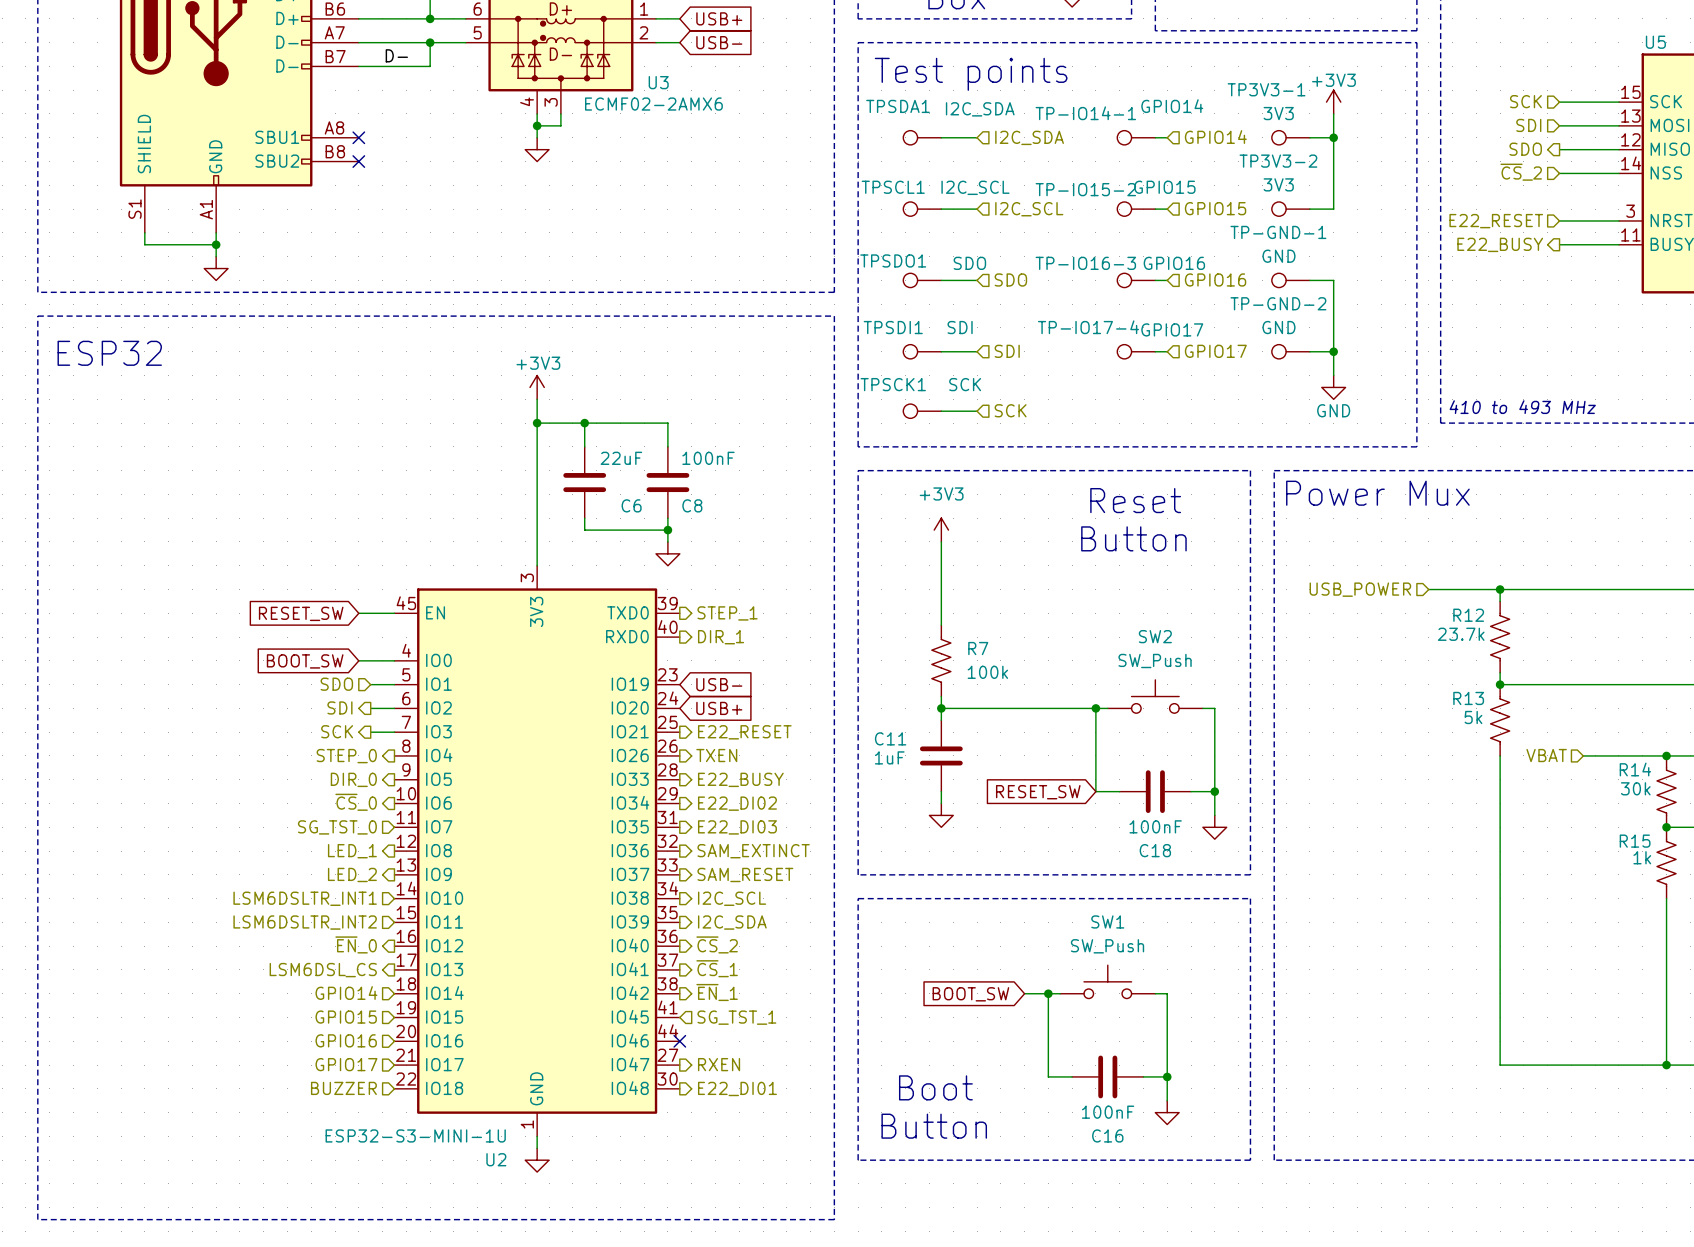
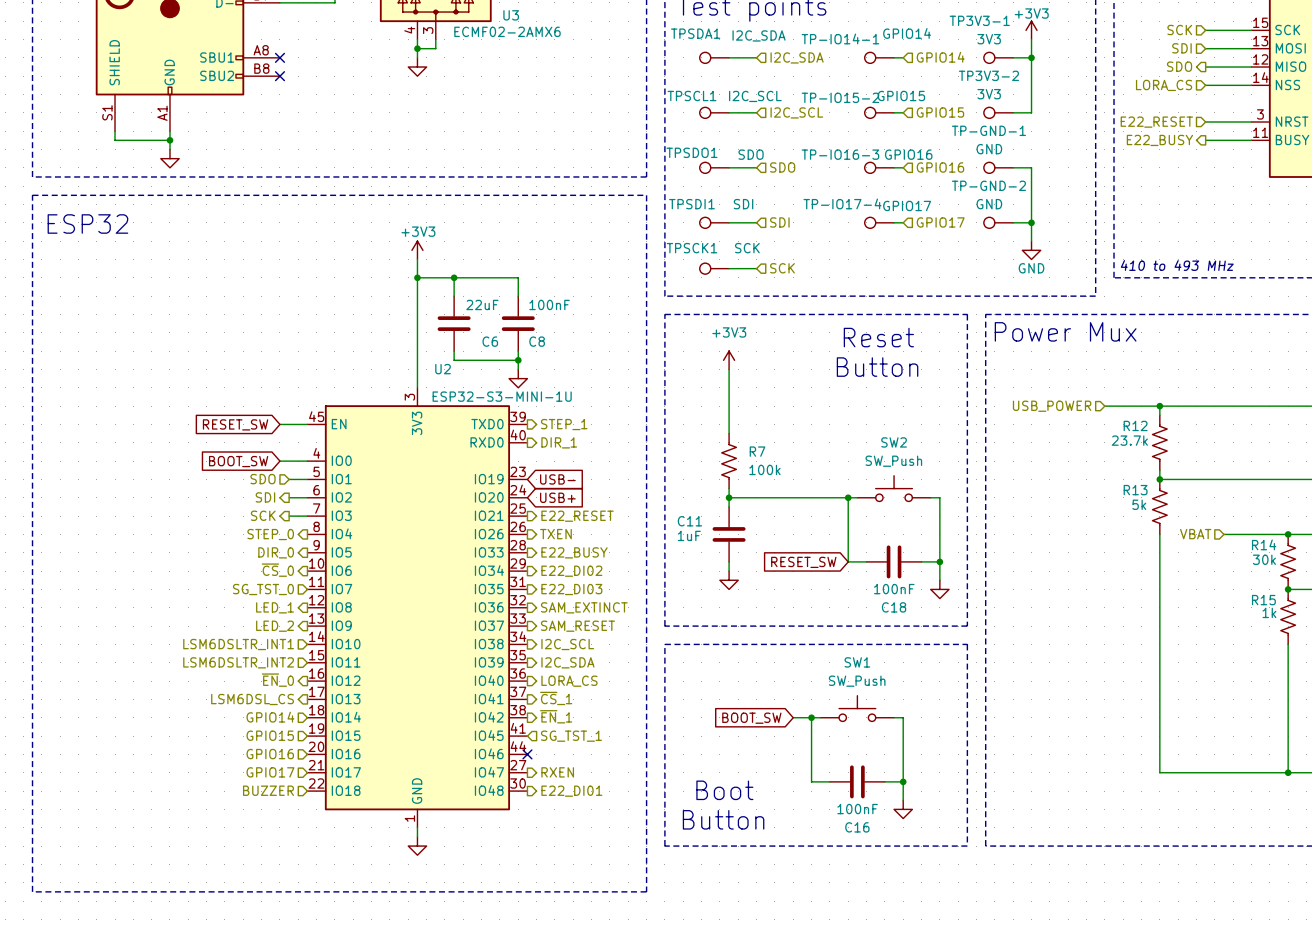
hierarchical label: ~{CS}_2 (1521, 172) -> LORA_CS (1164, 85)
hierarchical label: ~{CS}_2 (717, 944) -> LORA_CS (569, 681)
U2 value position: ESP32-S3-MINI-1U (415, 1135) -> ESP32-S3-MINI-1U (502, 396)
U2 name position: U2 (496, 1159) -> U2 (443, 369)

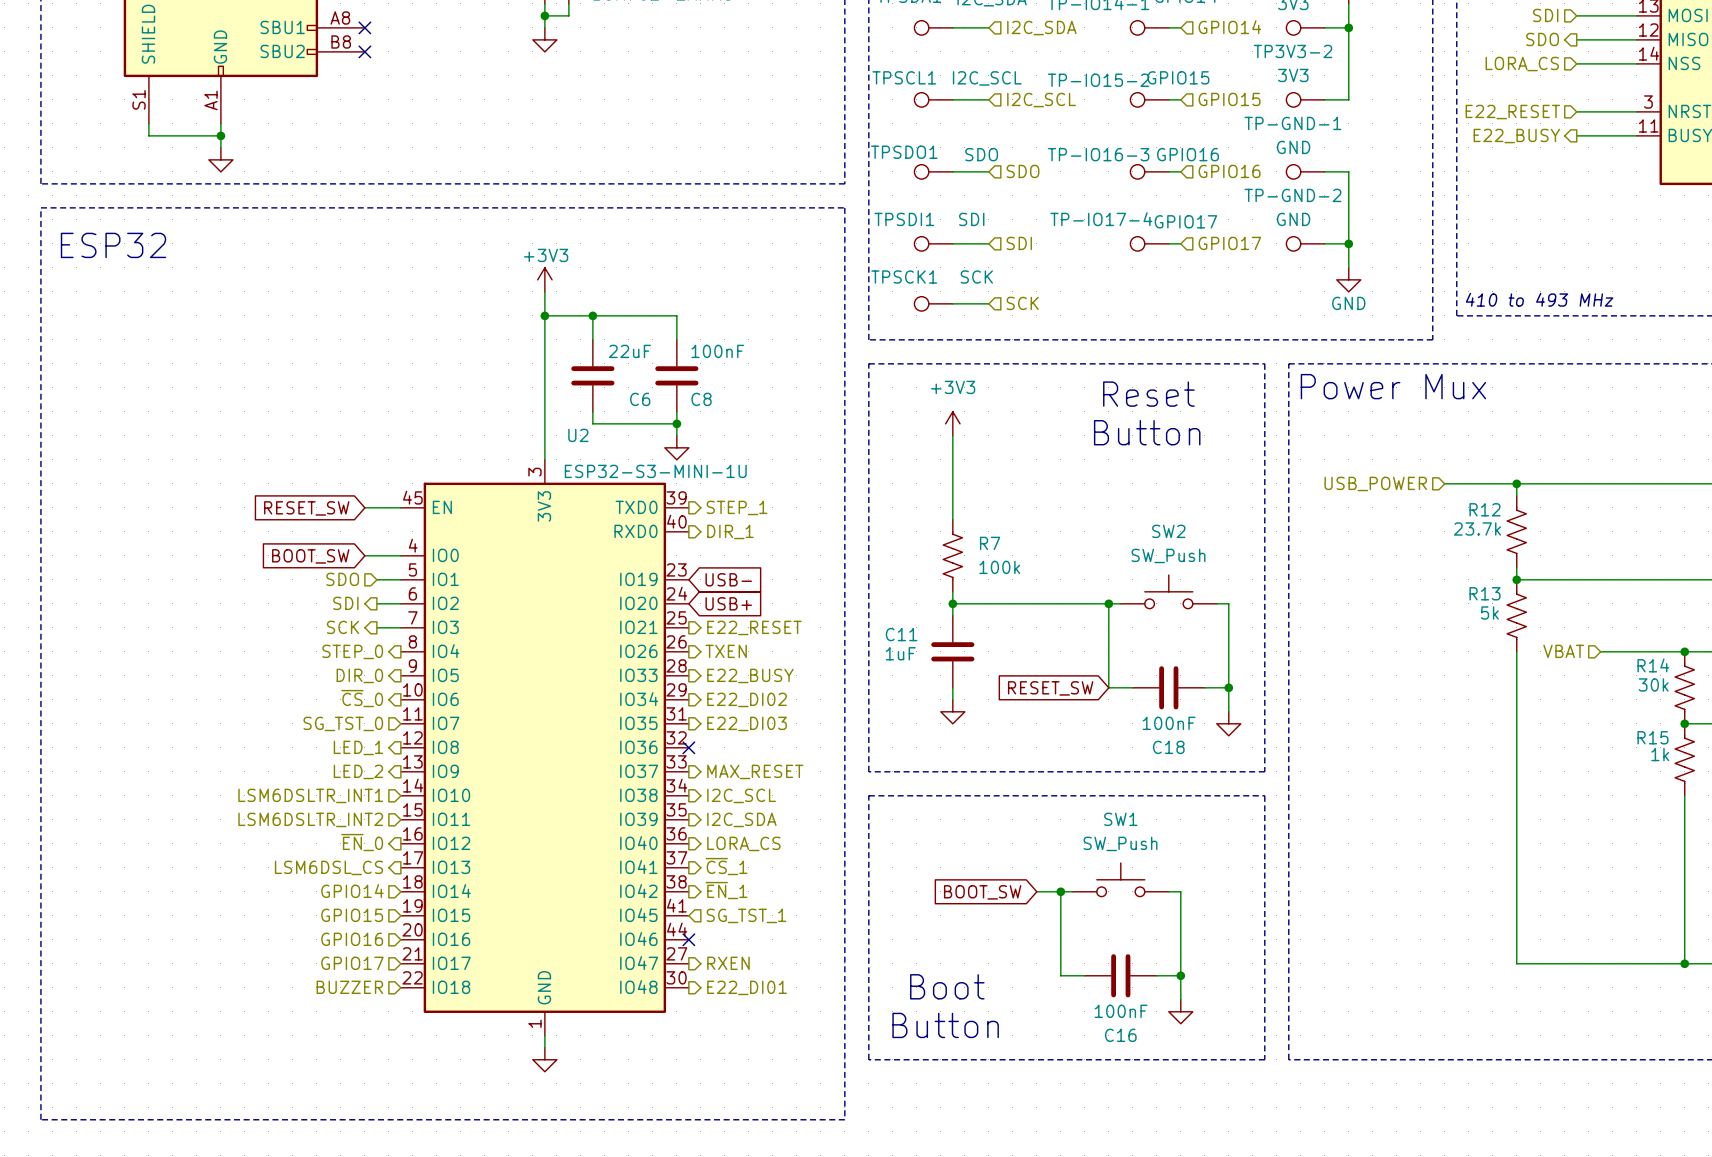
no-connect mark: none -> (688, 747)
hierarchical label: SAM_EXTINCT (584, 607) -> none
hierarchical label: SAM_RESET (577, 626) -> MAX_RESET (755, 771)

